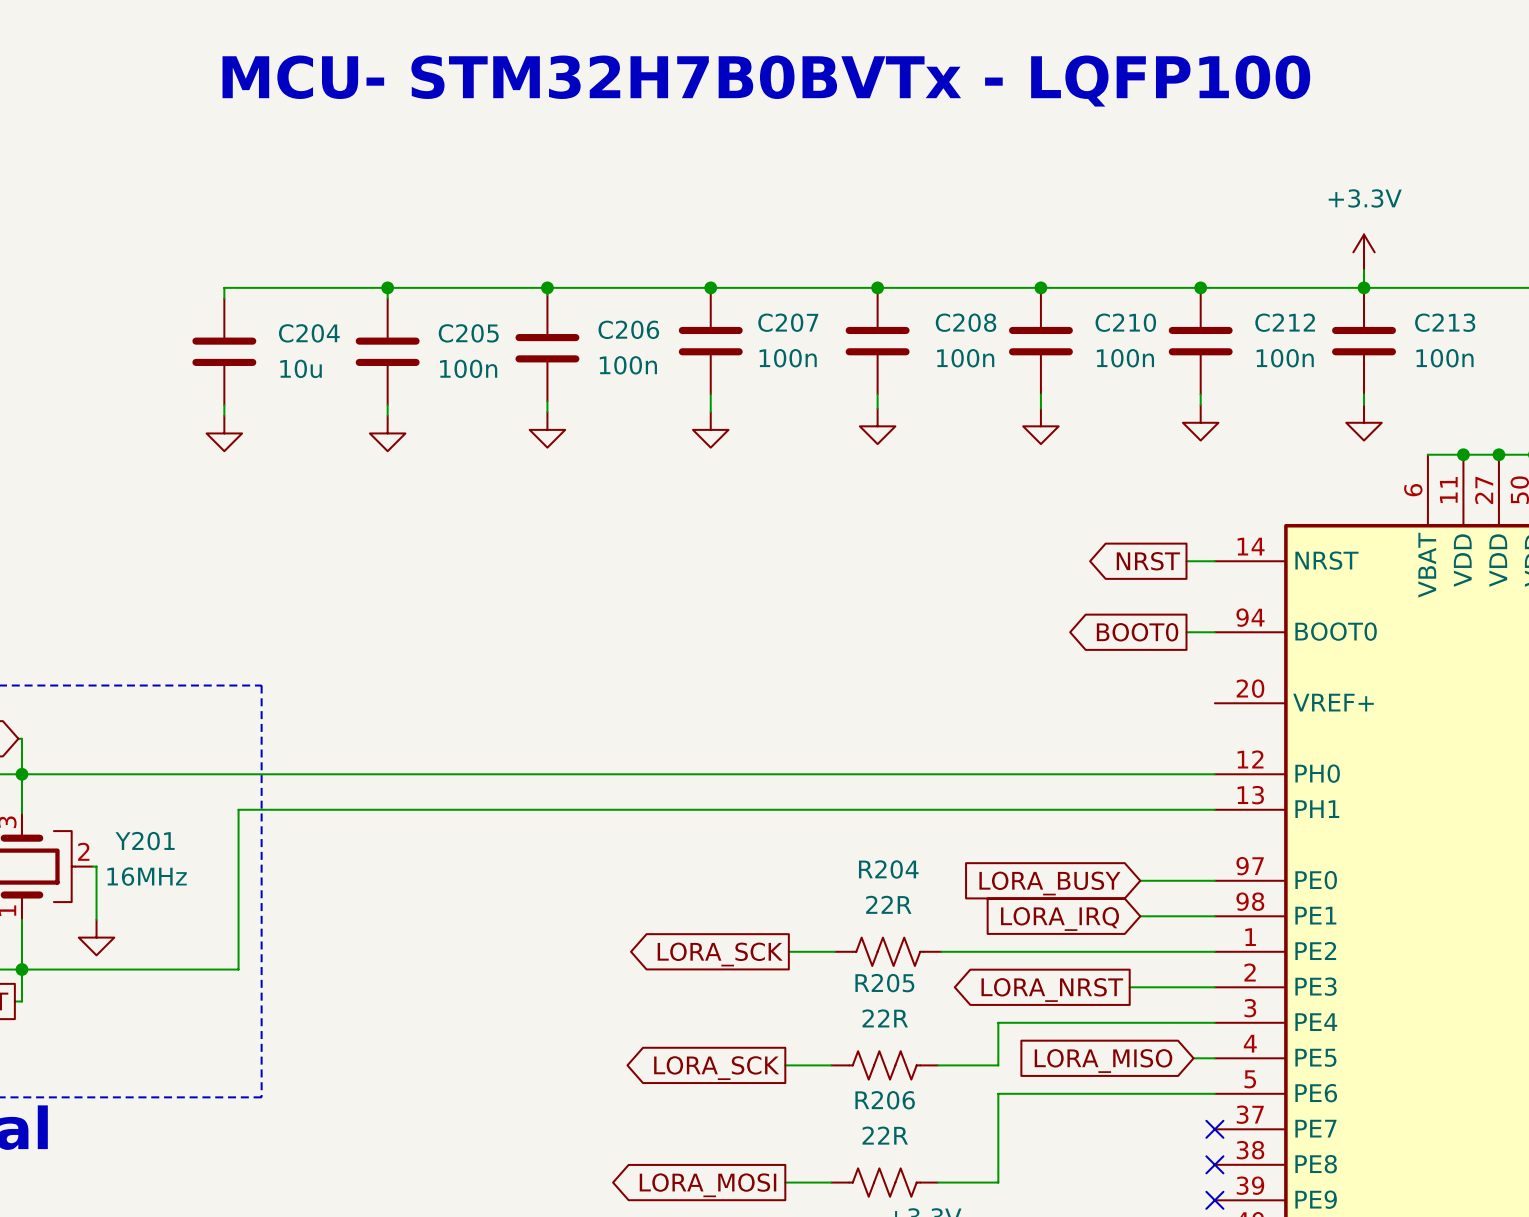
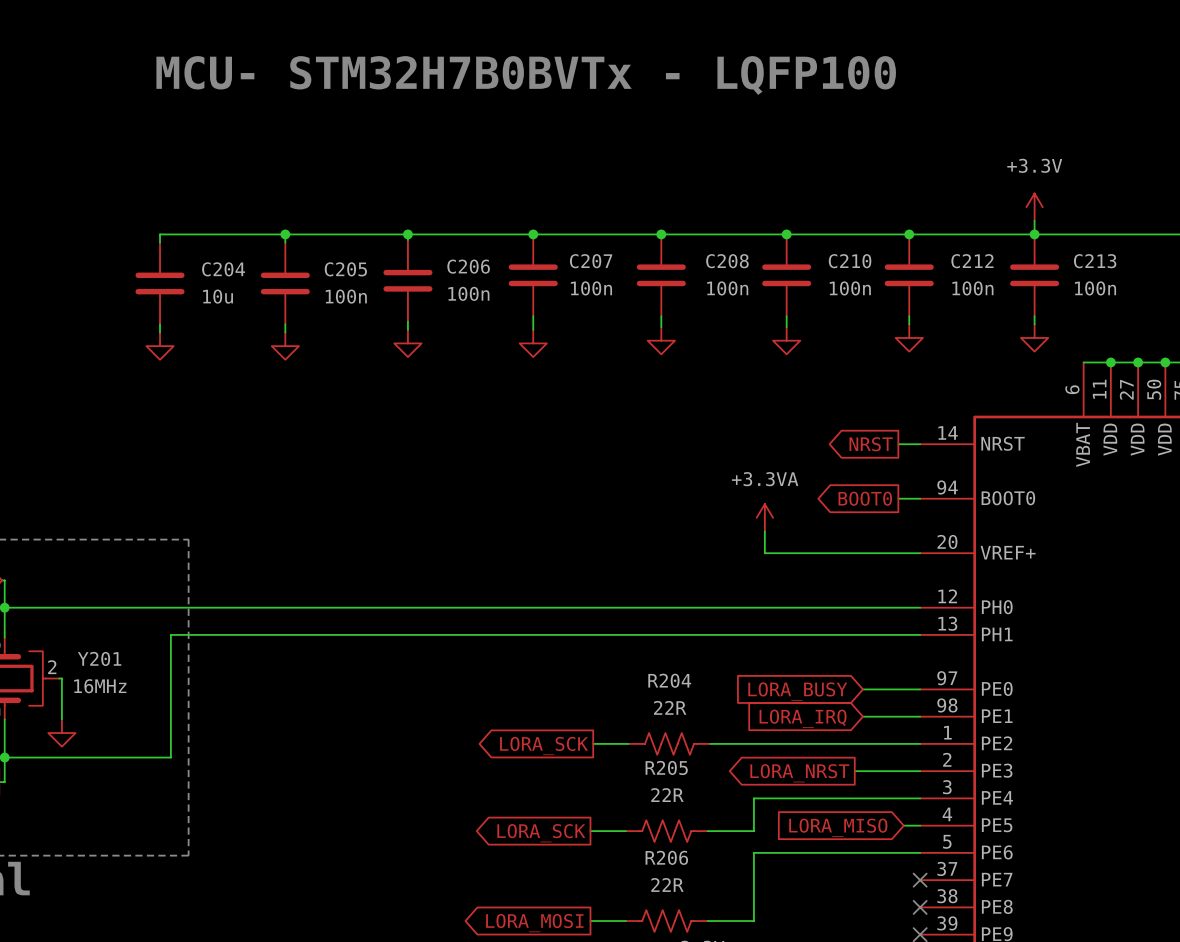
power symbol: none -> +3.3VA (764, 517)
wire: none -> (764, 531) (764, 553) (920, 553)

